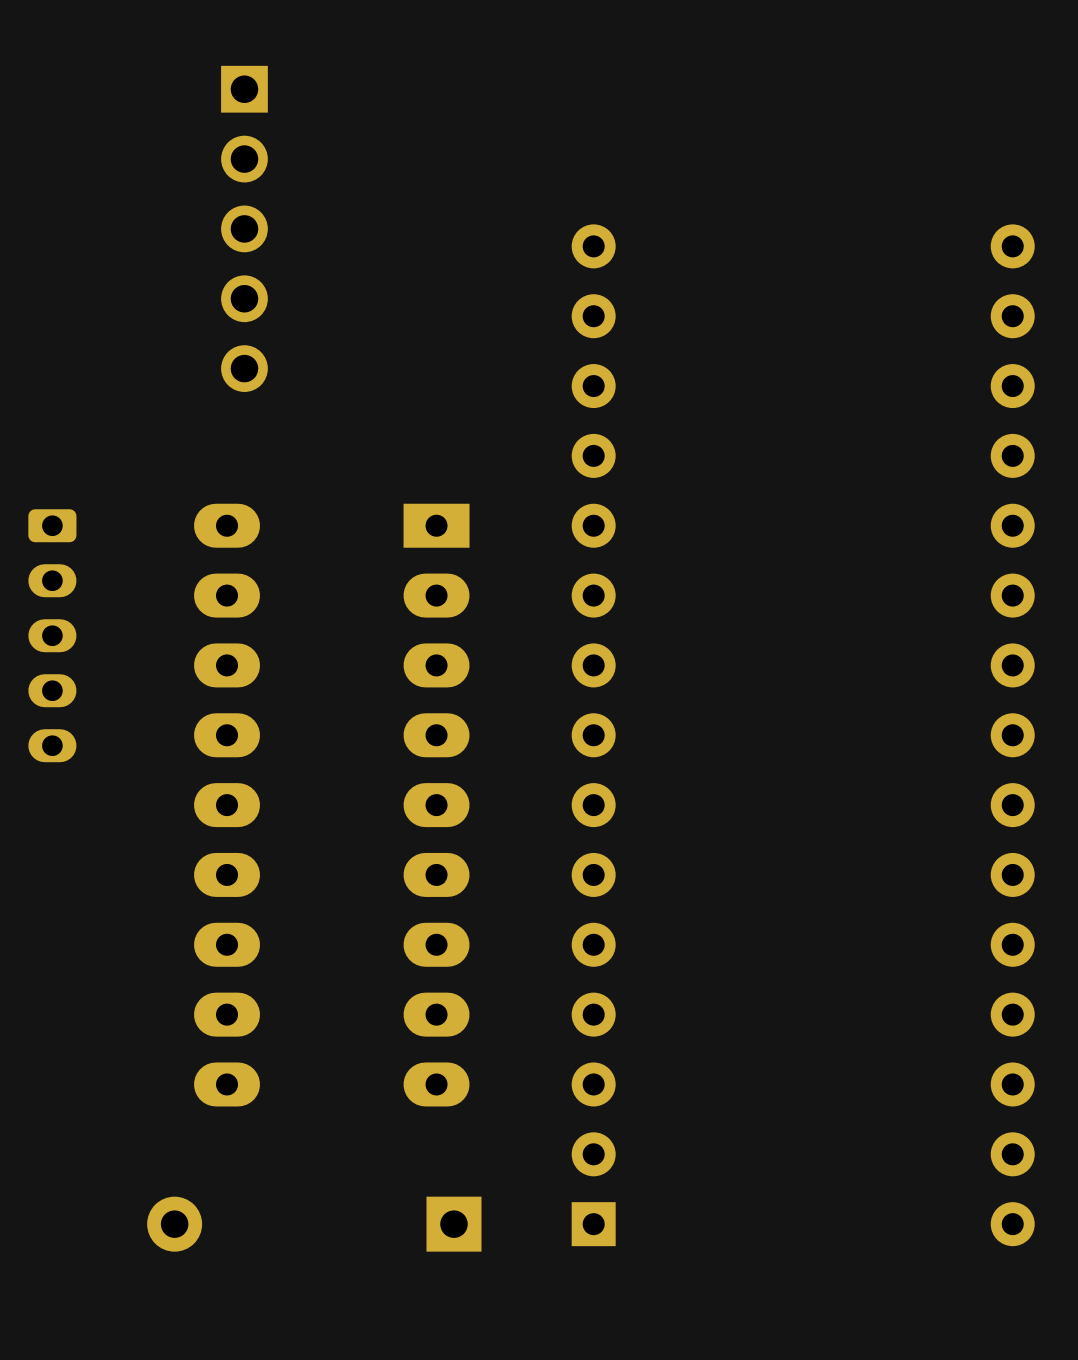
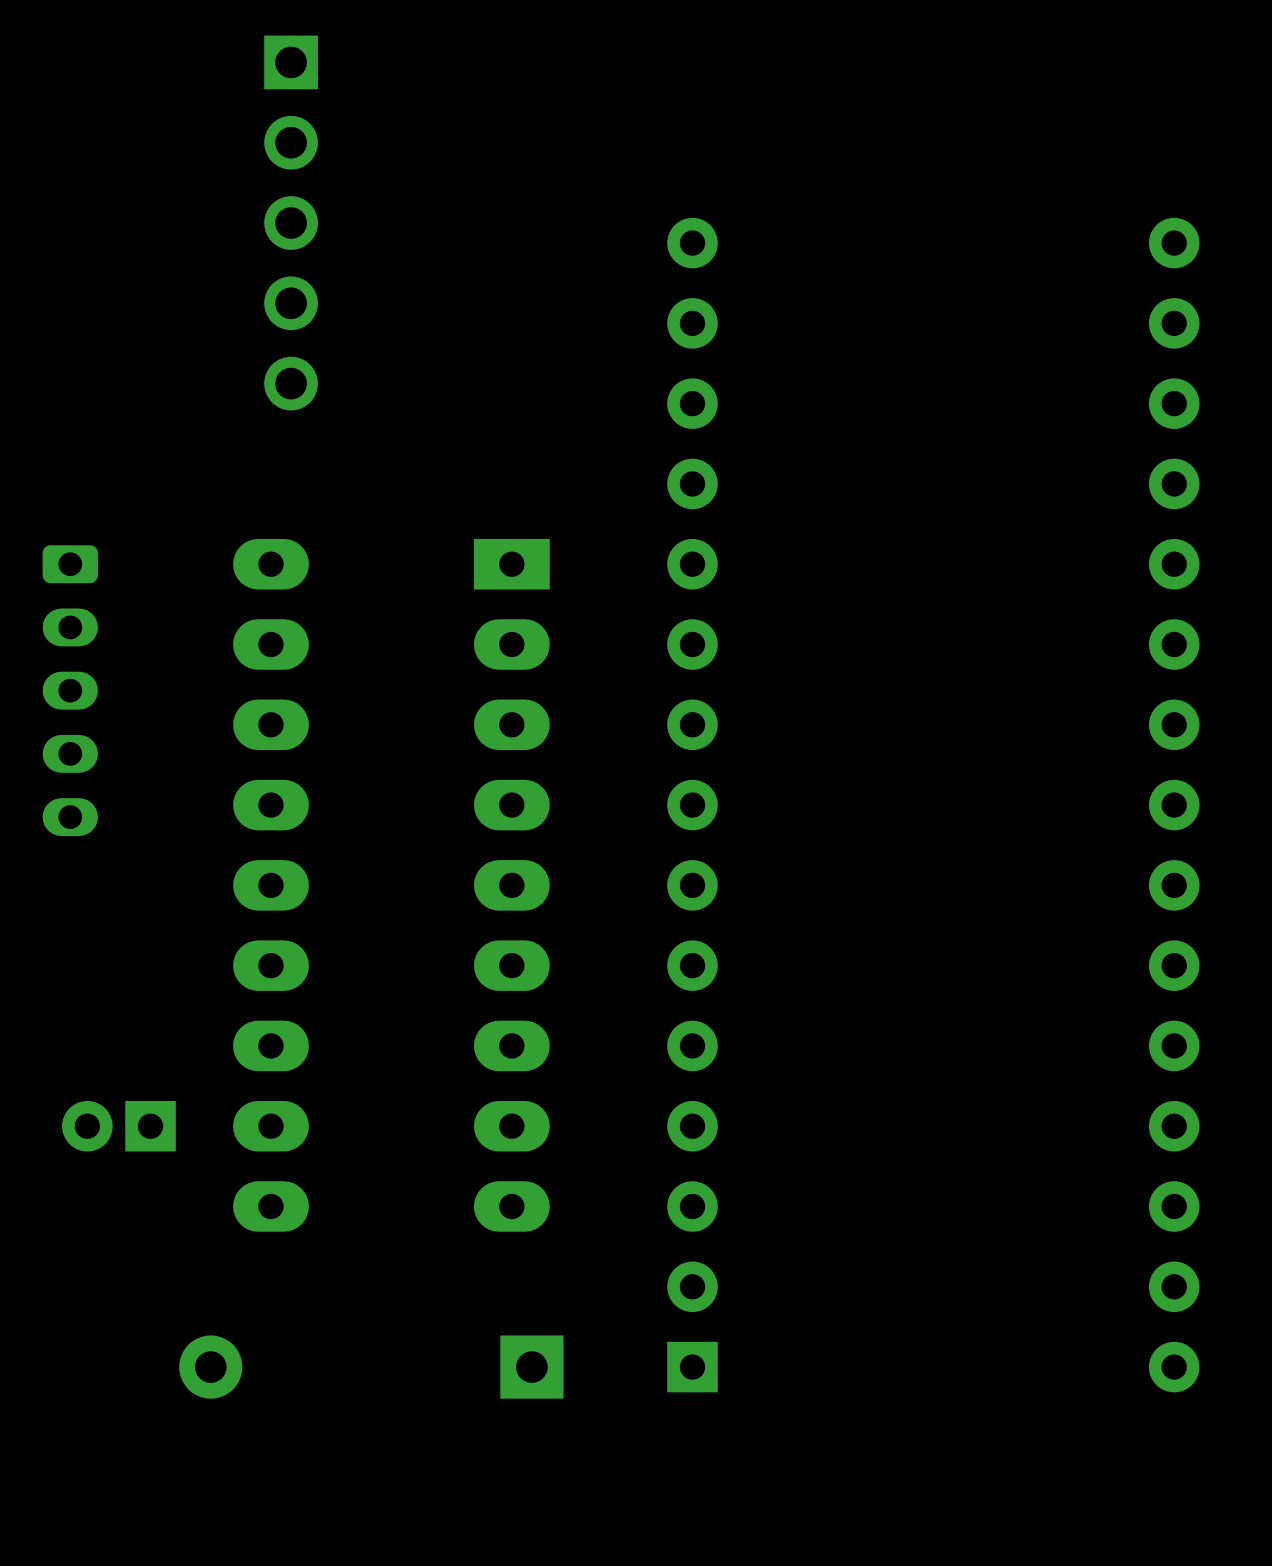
part: none -> (118, 1126)

